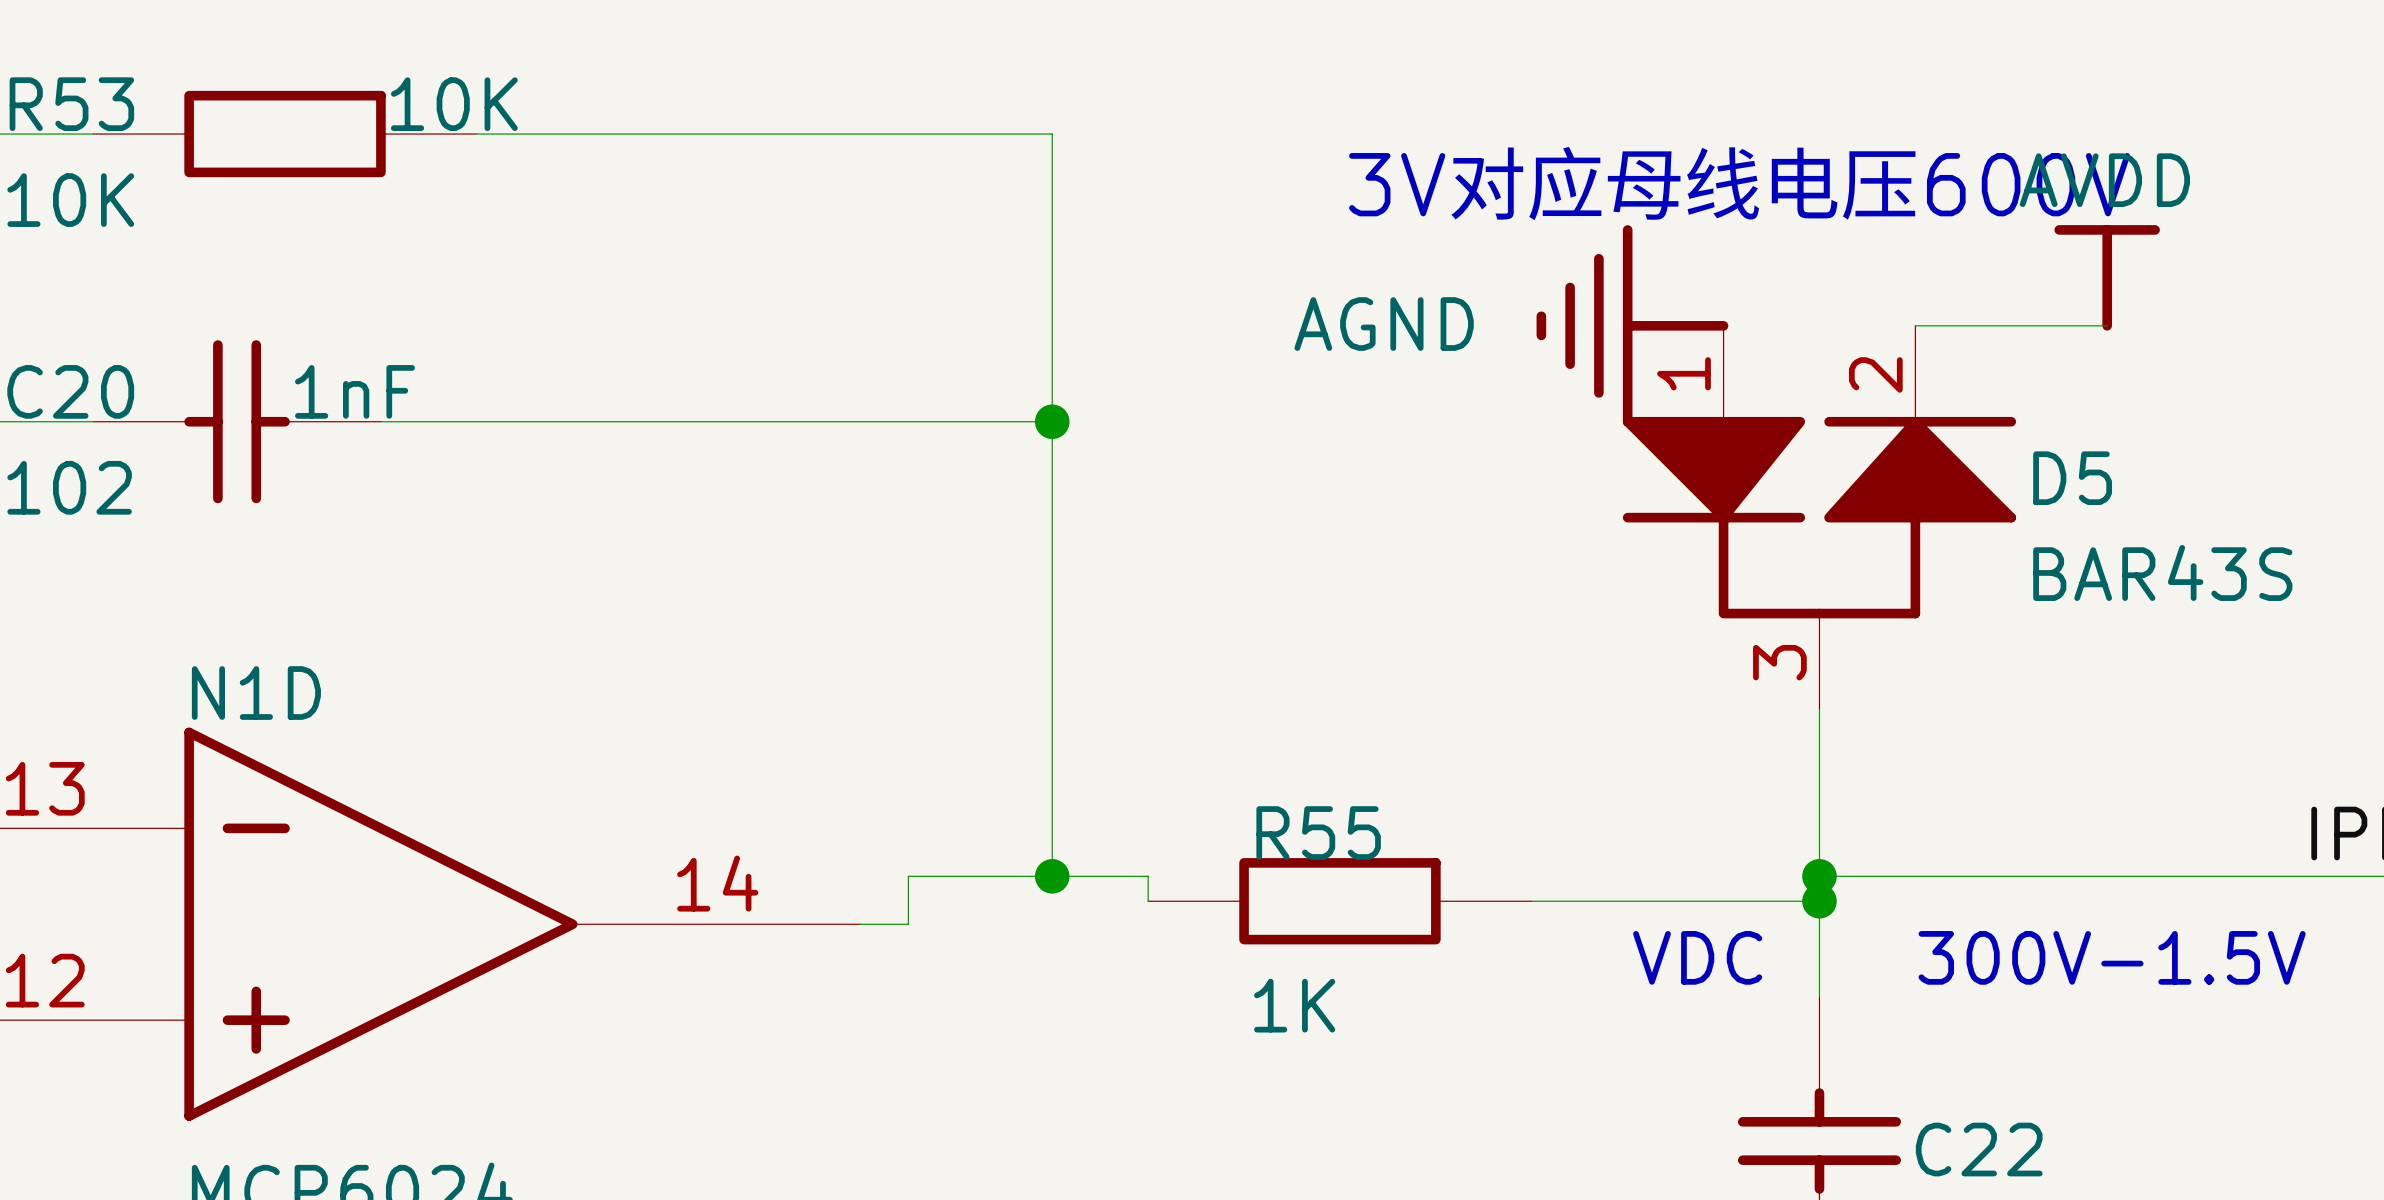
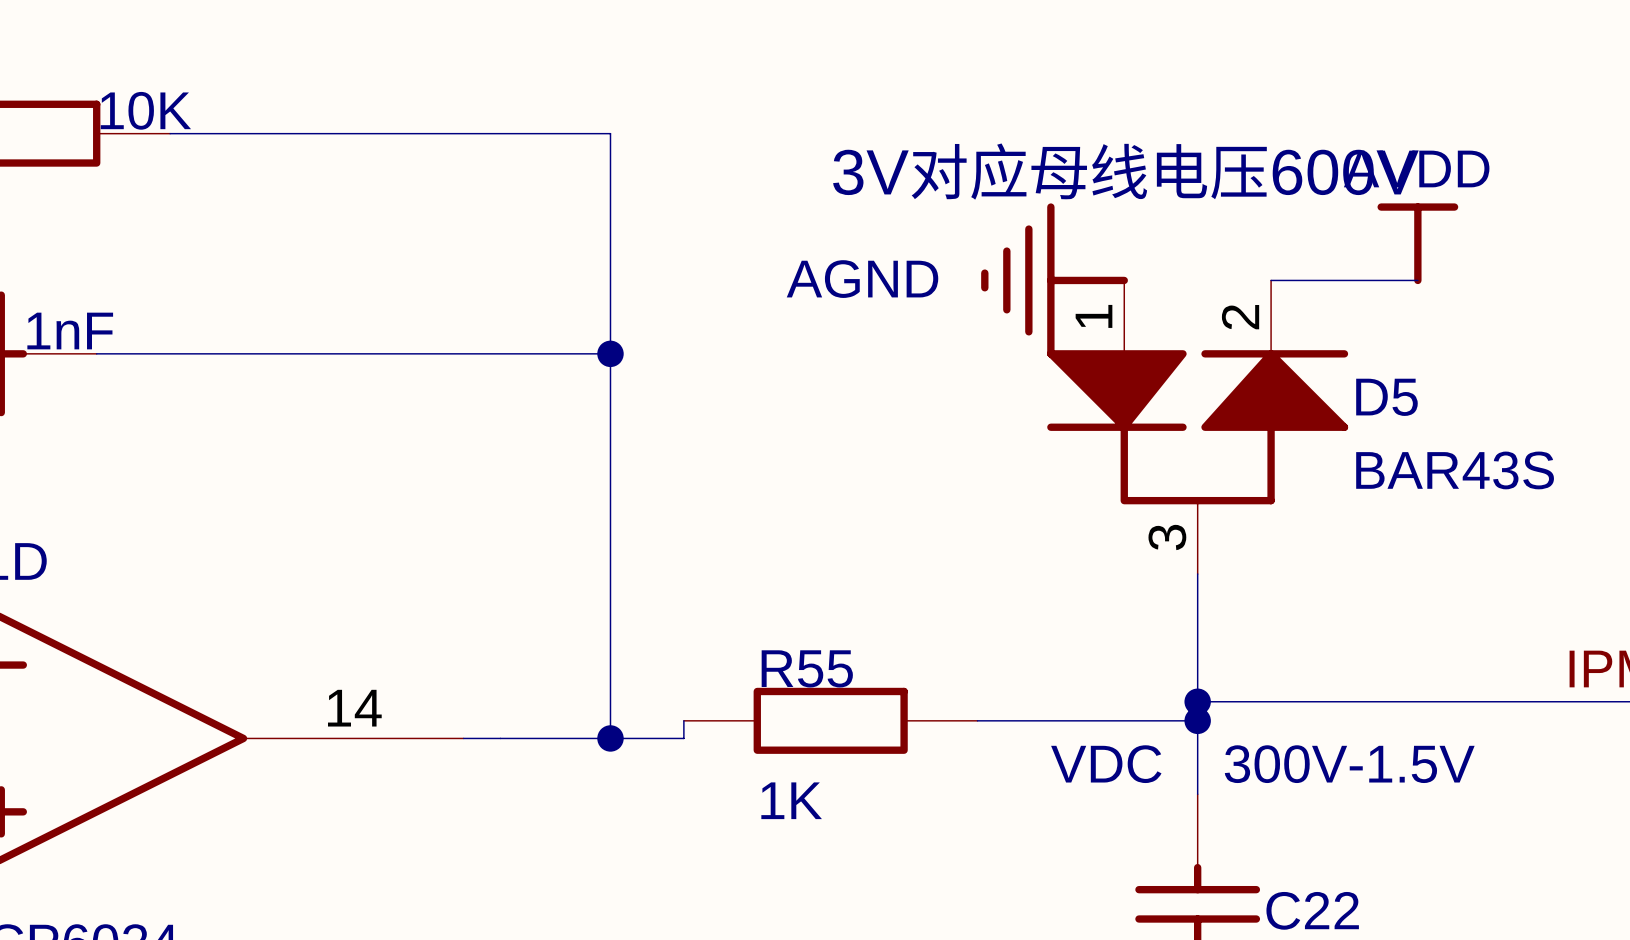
wire: none -> (610, 701) (610, 738)
junction position: (1052, 876) -> (610, 738)
wire: (1148, 901) (1148, 876) (908, 876) (908, 924) -> (683, 720) (683, 738) (500, 738)

